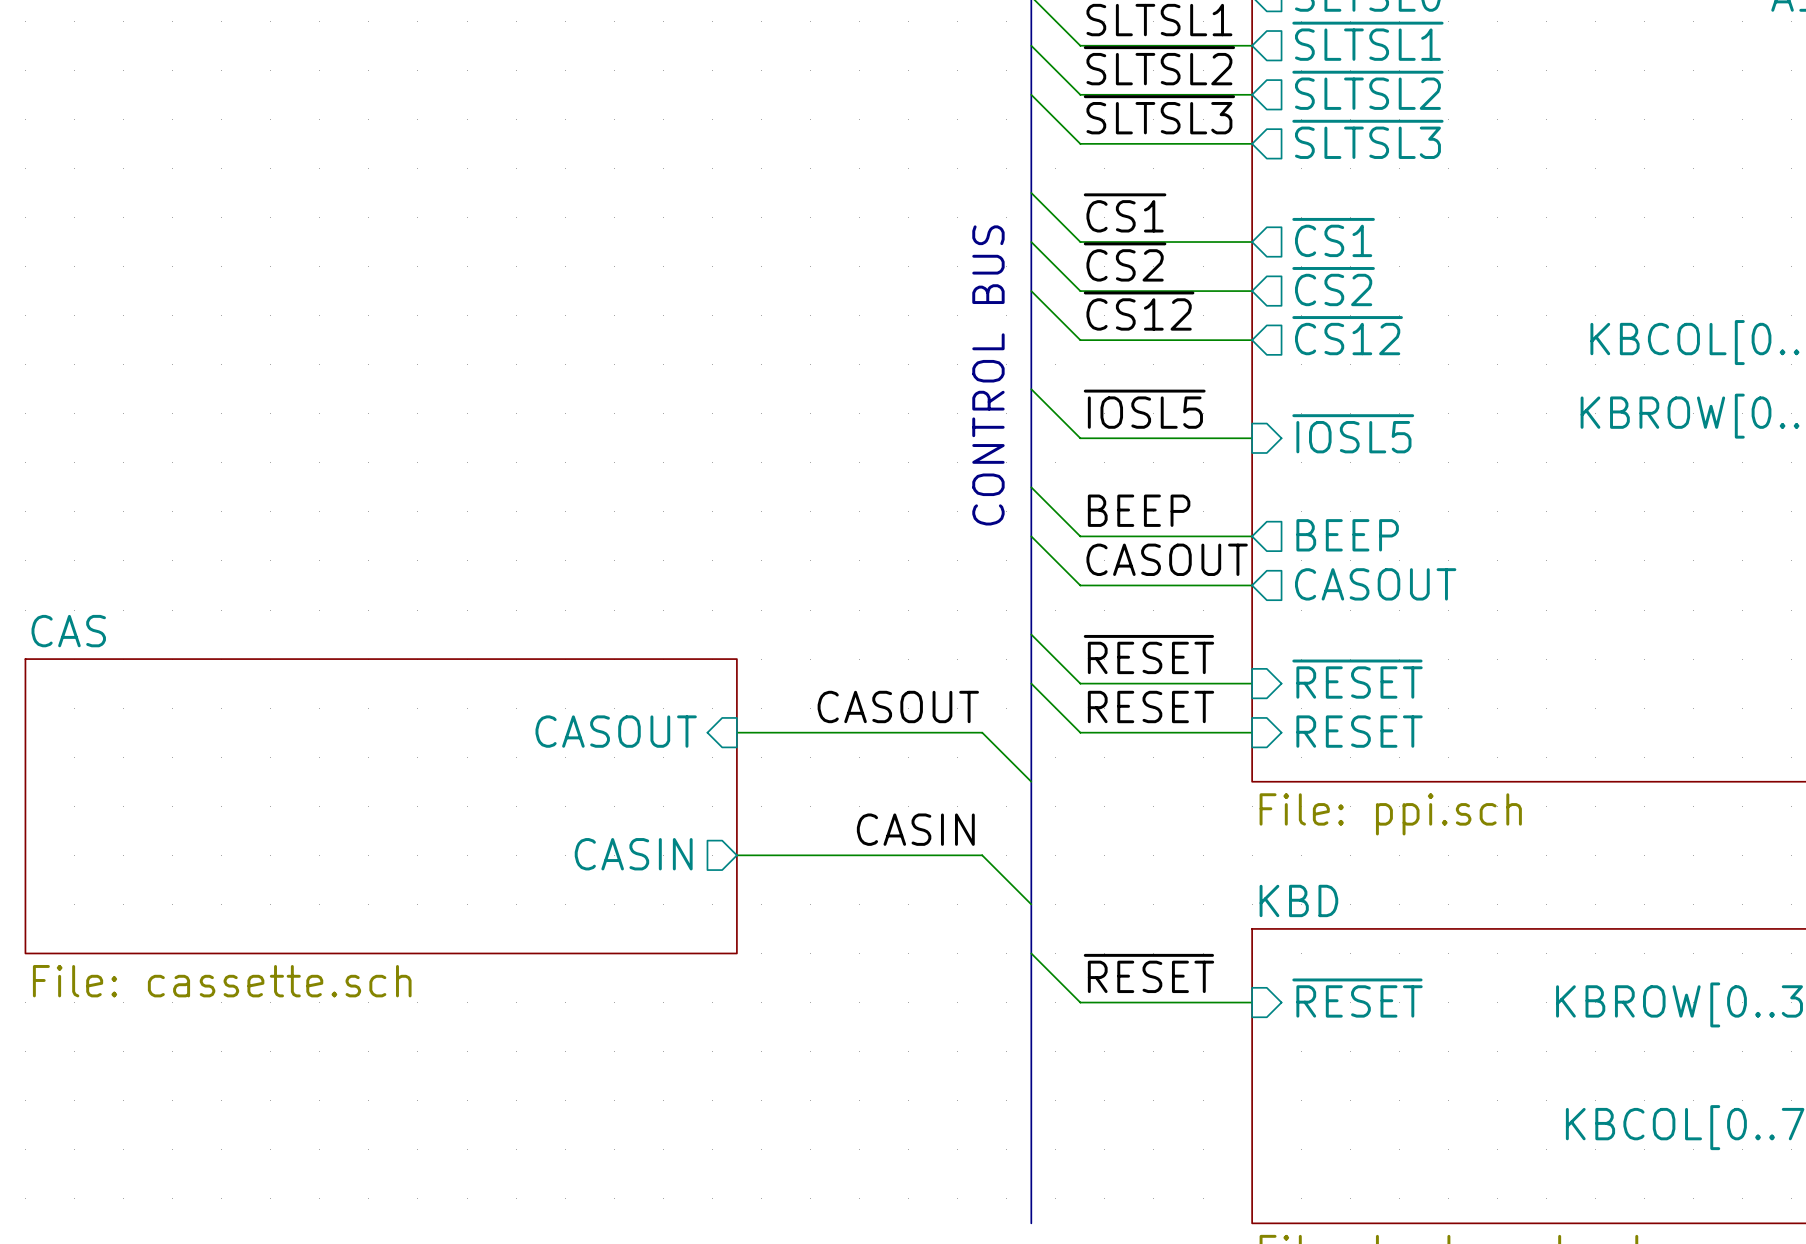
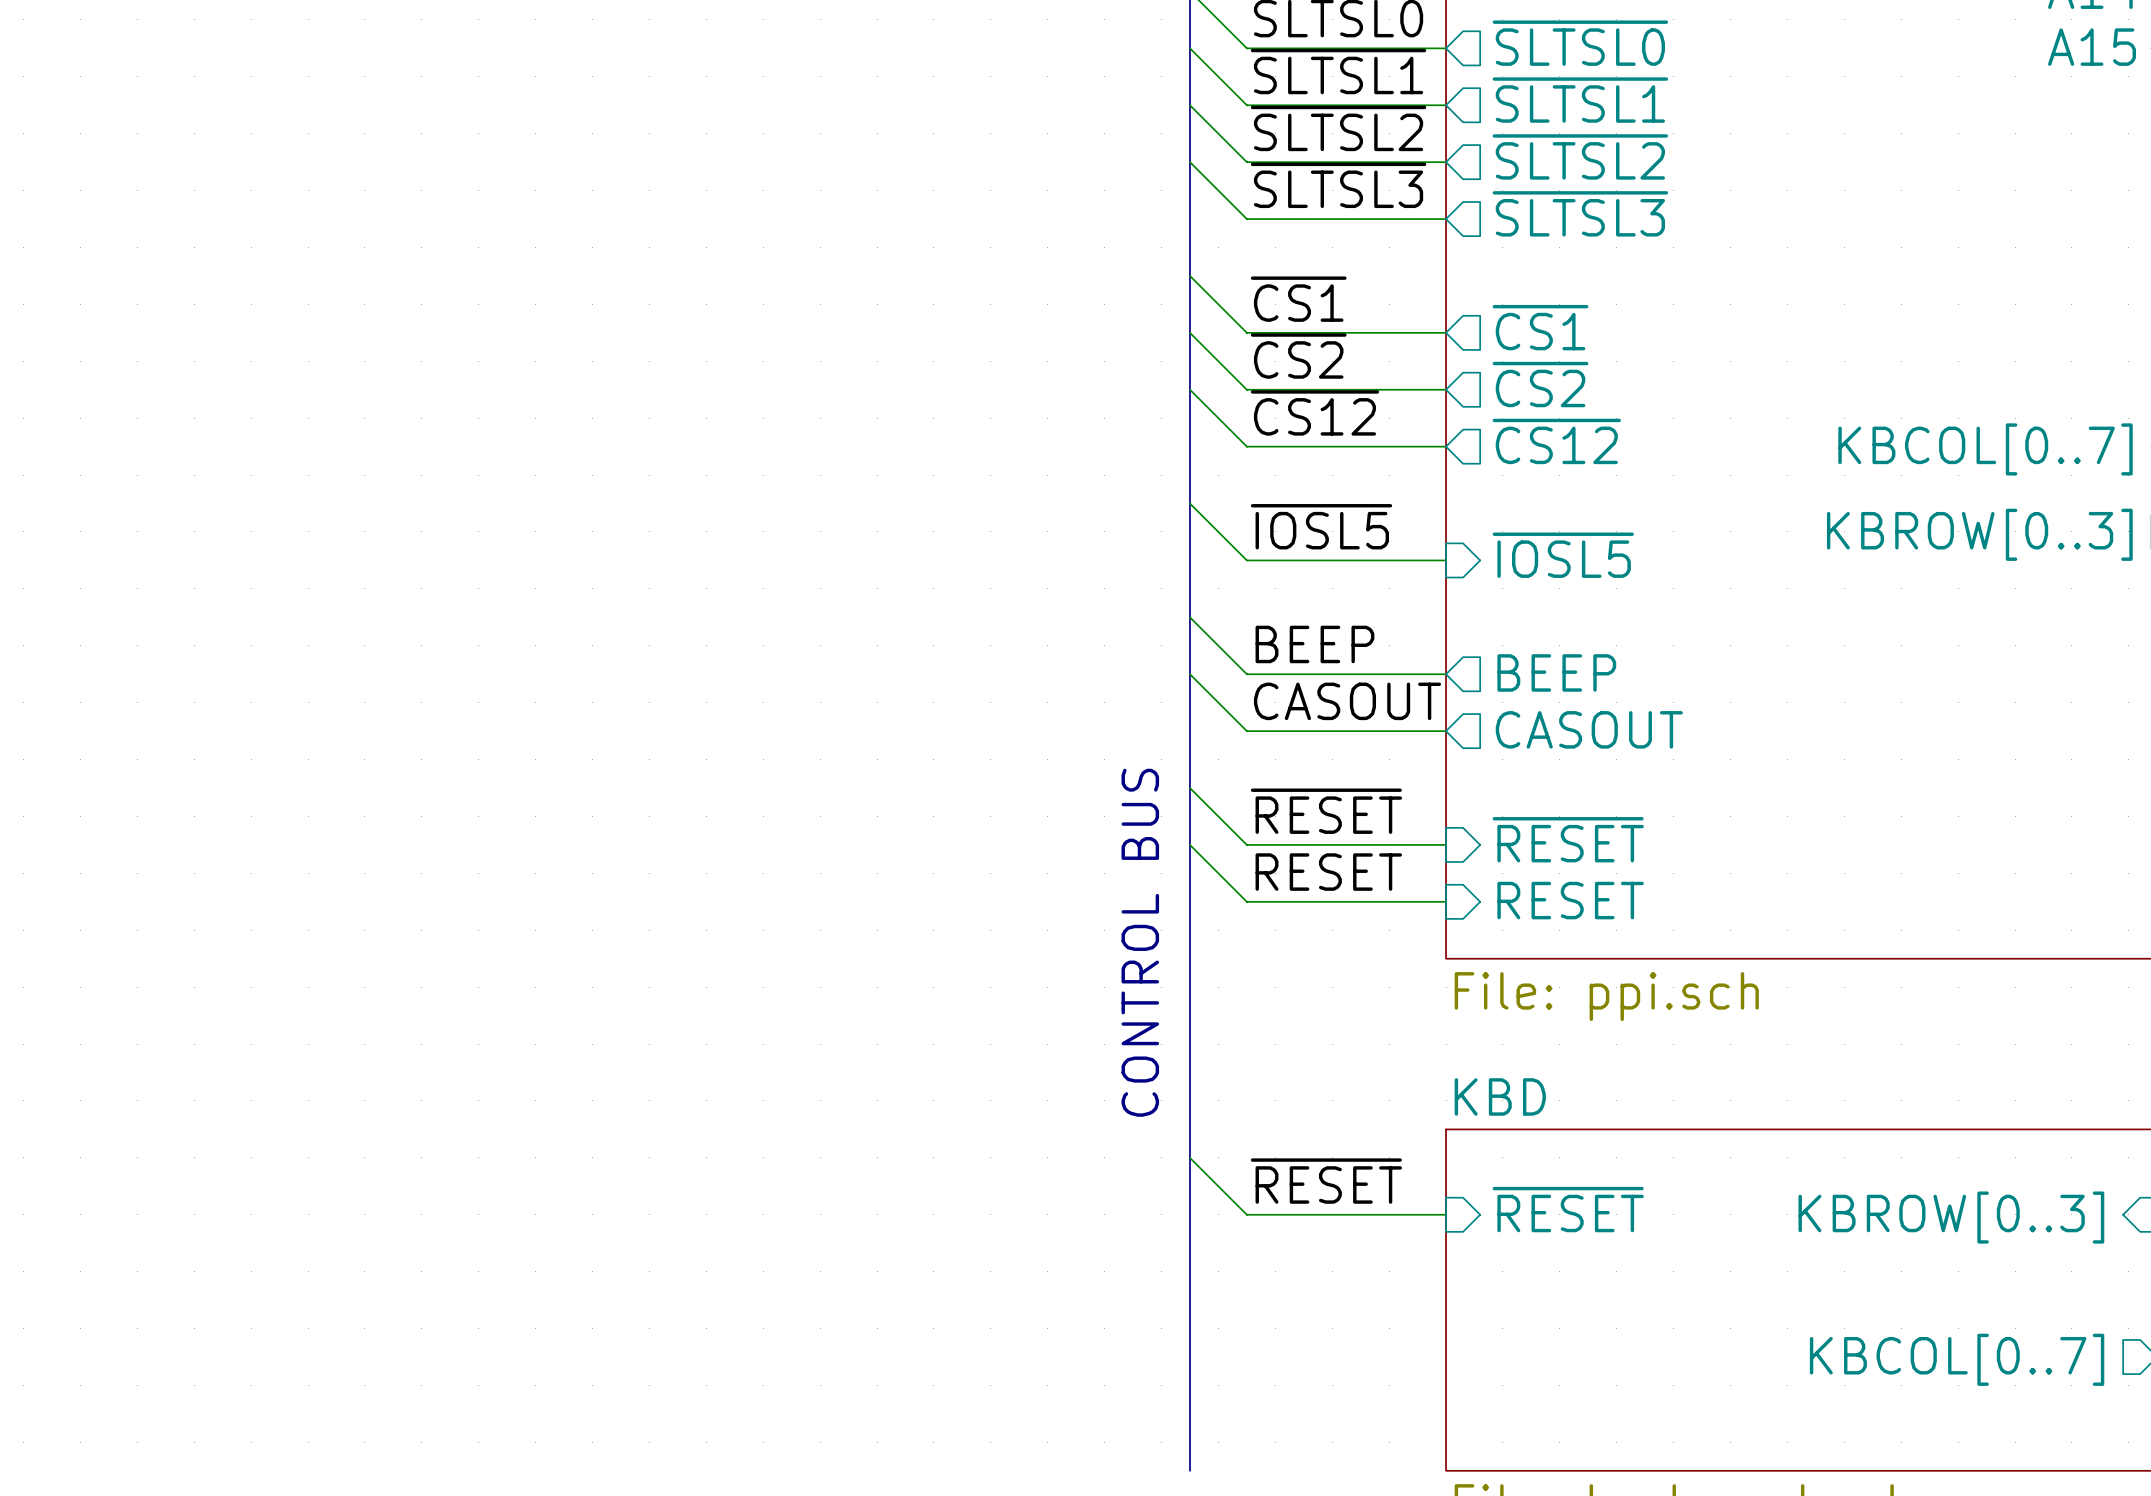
text position: CONTROL BUS (988, 375) -> CONTROL BUS (1140, 942)
label: CASOUT (898, 706) -> none
sheet pin: CASOUT (616, 731) -> none
wire: (736, 732) (982, 732) (1031, 781) -> none
sheet CAS: File: cassette.sch (381, 806) -> none
label: CASIN (915, 829) -> none
sheet pin: CASIN (633, 854) -> none
wire: (736, 855) (982, 855) (1031, 904) -> none

